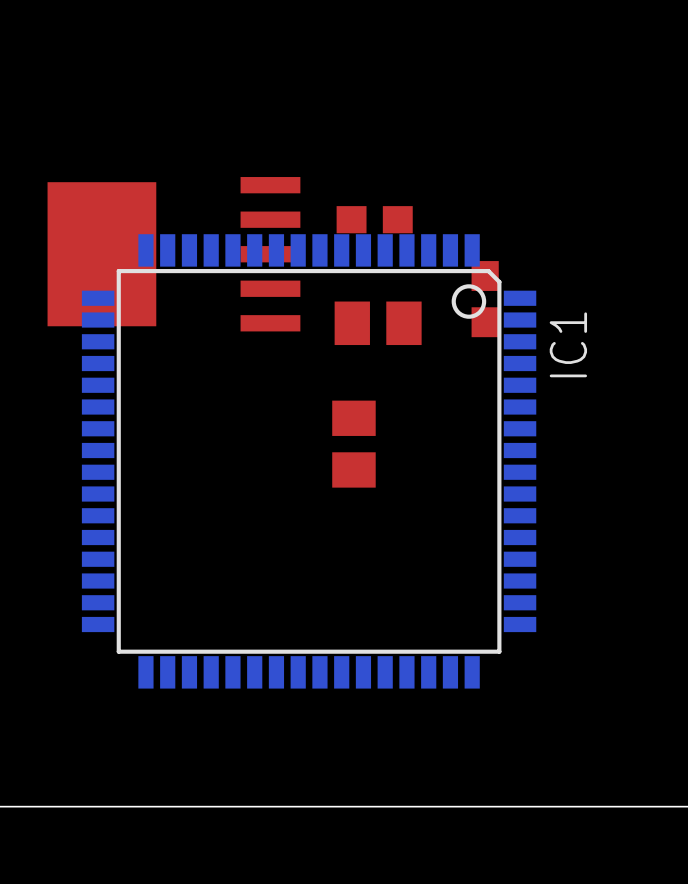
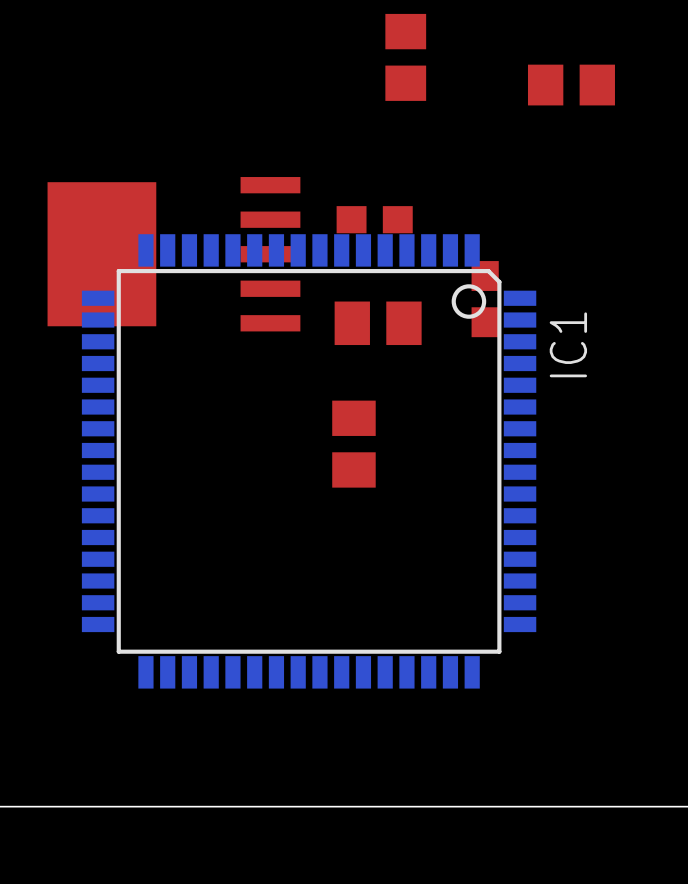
part: none -> (405, 57)
part: none -> (571, 85)

